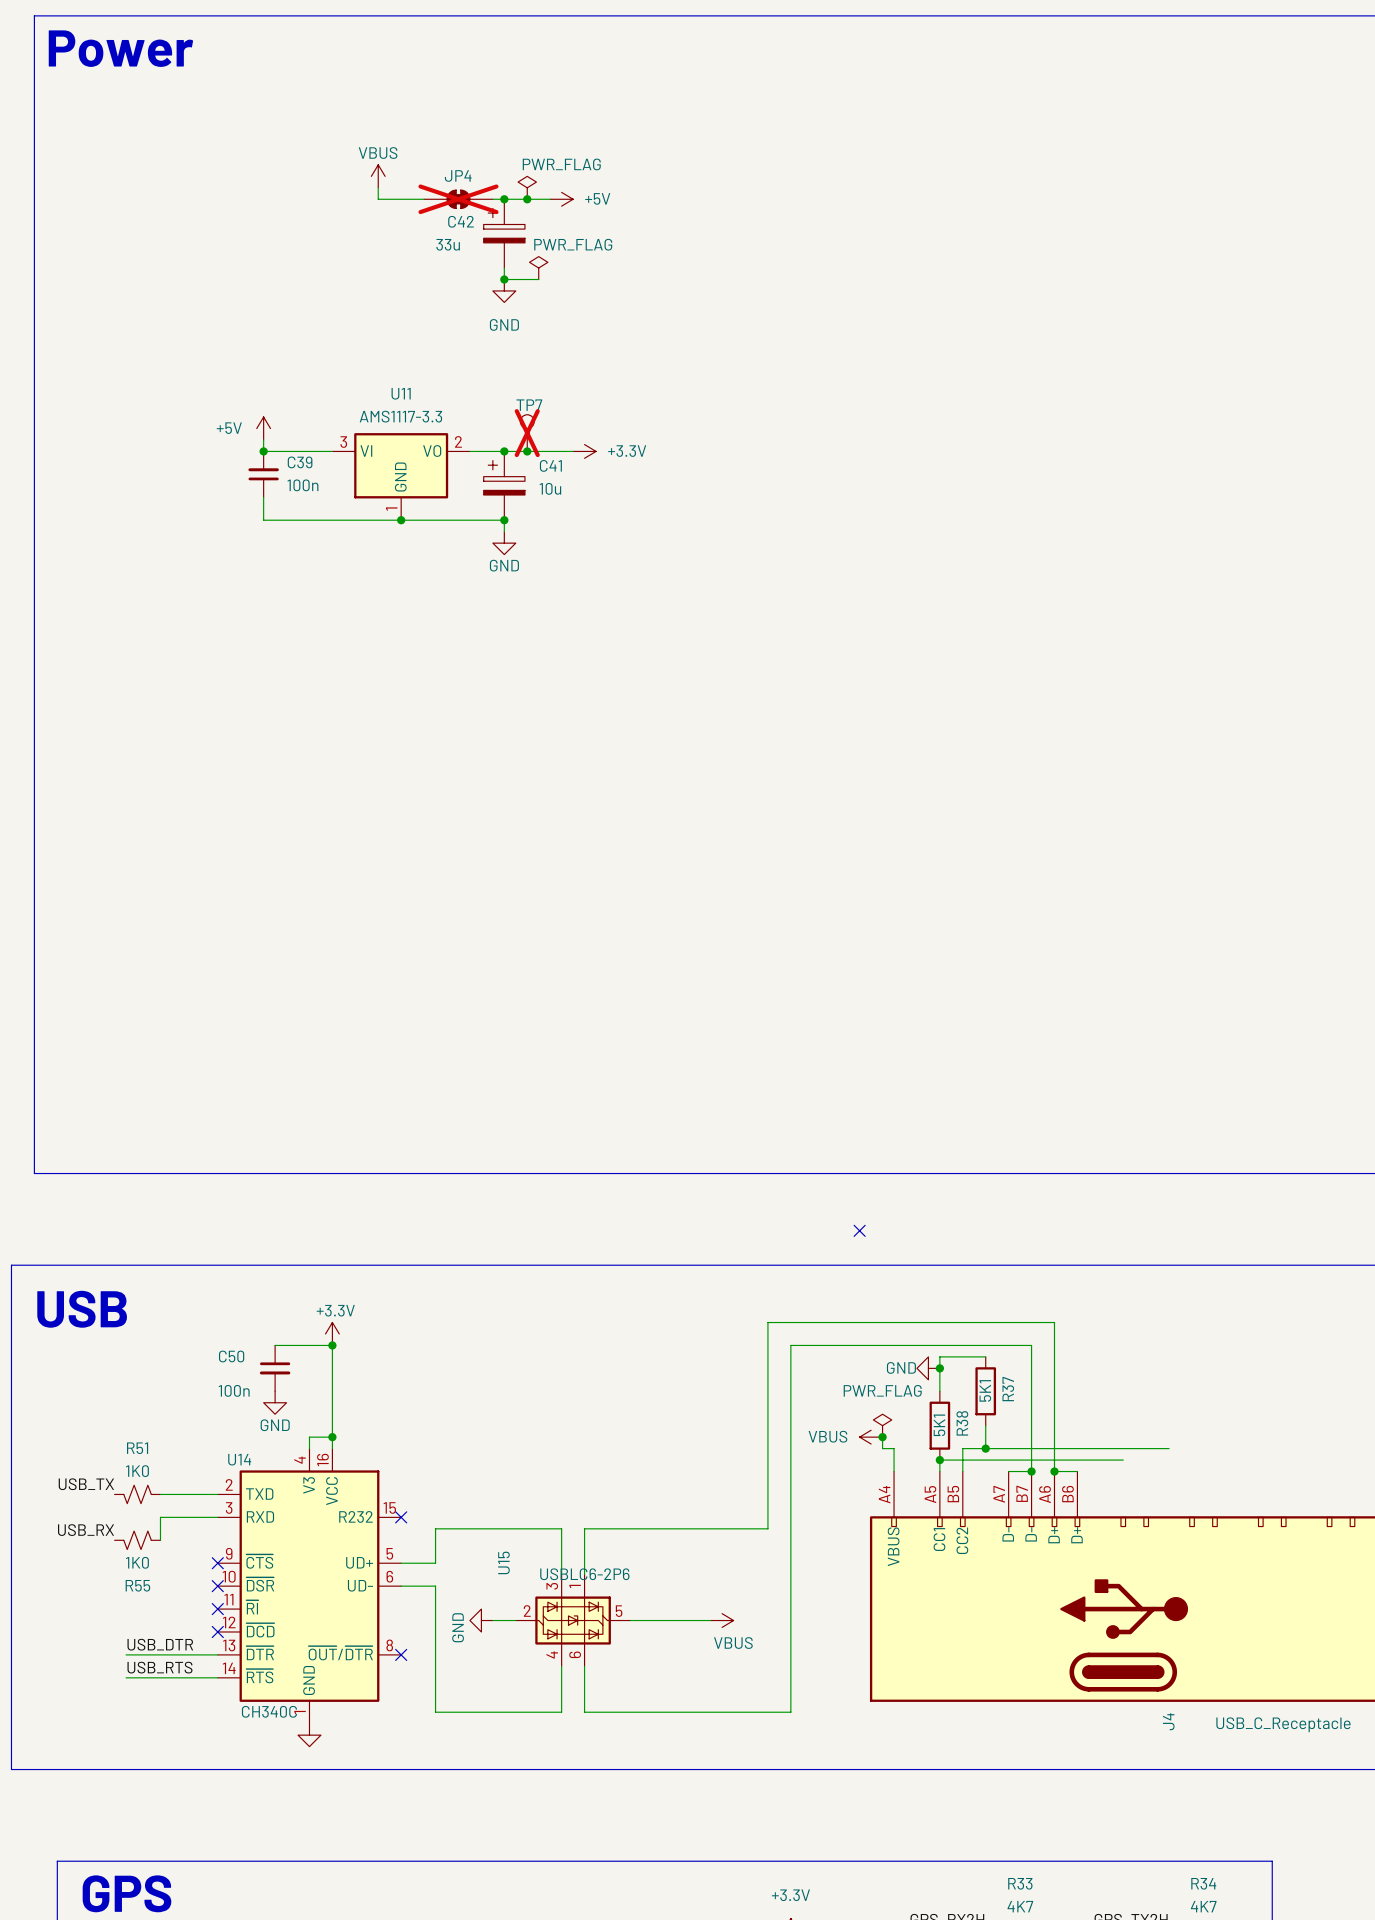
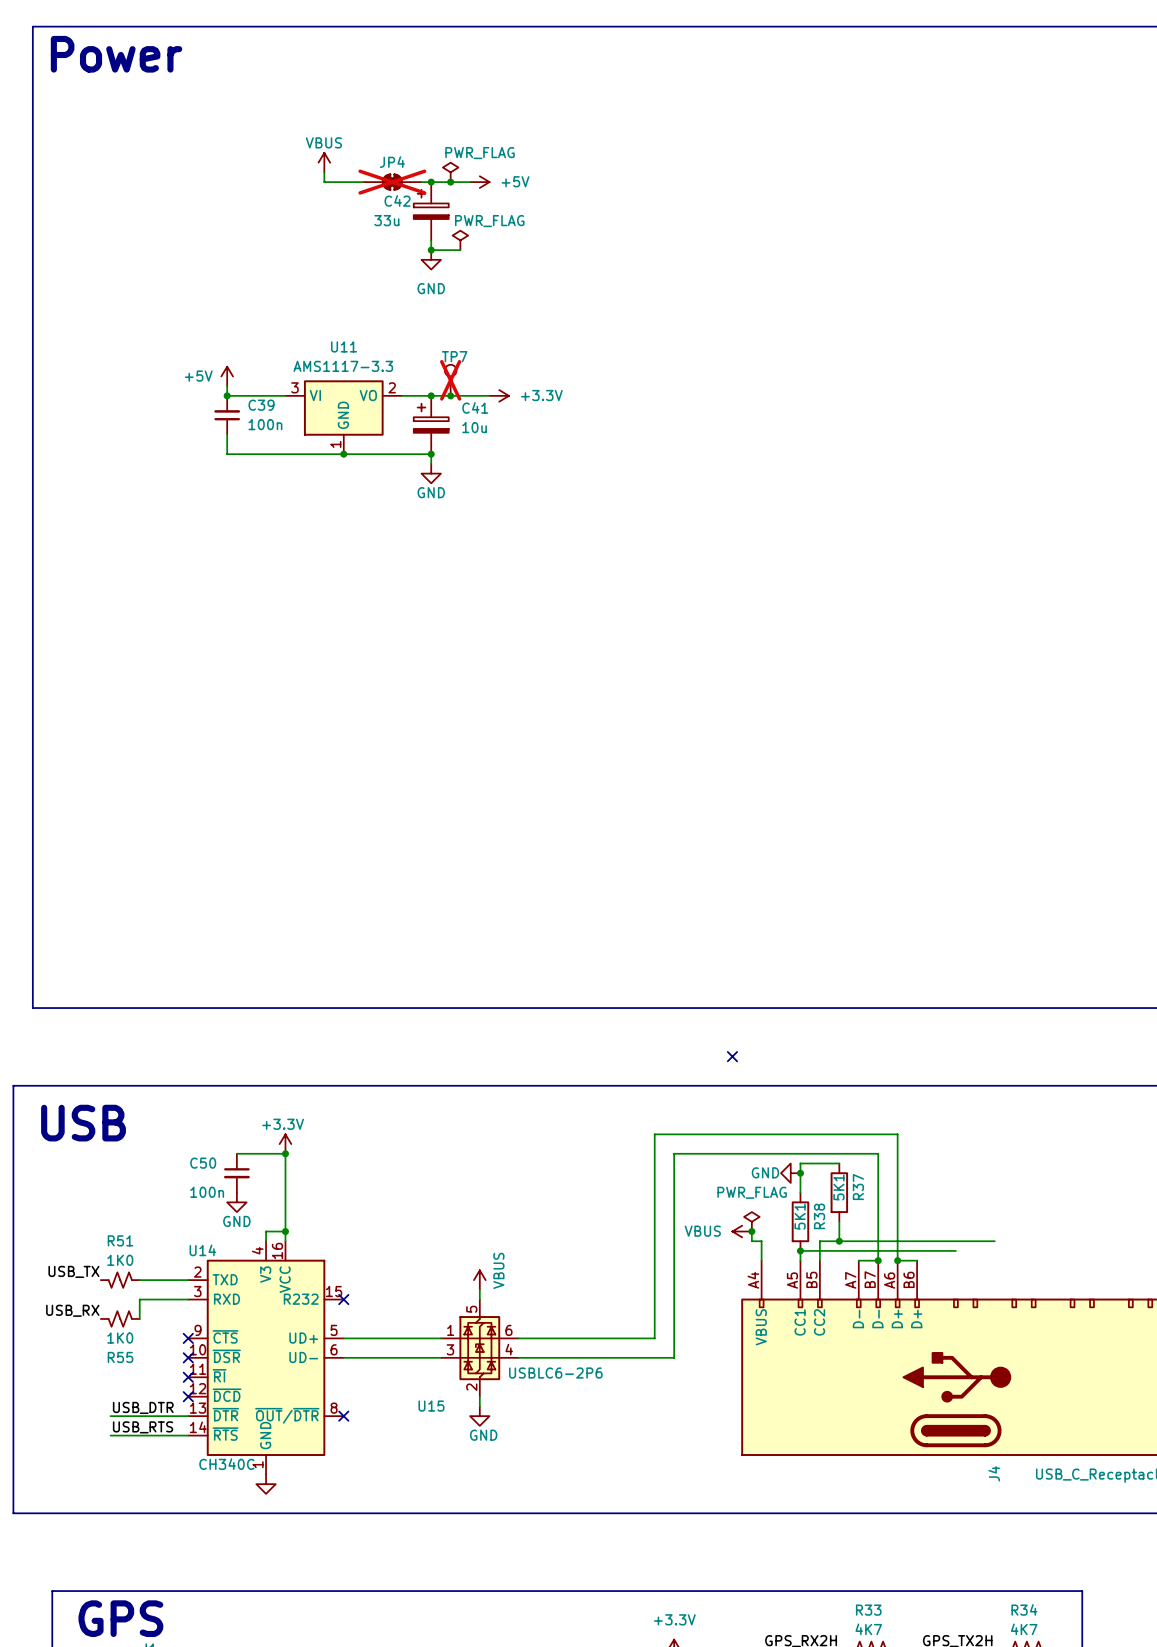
wire: none -> (479, 1289) (479, 1299)
wire: (767, 1528) (584, 1528) (584, 1574) -> (654, 1309) (654, 1338) (518, 1338)
wire: (435, 1563) (435, 1528) (561, 1528) (561, 1574) -> (372, 1338) (440, 1338)
U15 value position: USBLC6-2P6 (584, 1574) -> USBLC6-2P6 (555, 1373)
wire: (435, 1586) (435, 1712) (561, 1712) (561, 1666) -> (372, 1357) (440, 1357)
wire: (790, 1586) (790, 1712) (584, 1712) (584, 1666) -> (674, 1357) (518, 1357)
power symbol rotation: 0° (481, 1620) -> 90° counterclockwise (479, 1416)
power symbol position: GND (481, 1620) -> GND (479, 1416)
wire: (492, 1620) (515, 1620) -> none
U15 rotation: 0° (573, 1620) -> 90° counterclockwise (479, 1348)
wire: (630, 1620) (710, 1620) -> none
power symbol rotation: 0° (722, 1620) -> 90° counterclockwise (479, 1280)
power symbol position: VBUS (722, 1620) -> VBUS (479, 1280)

